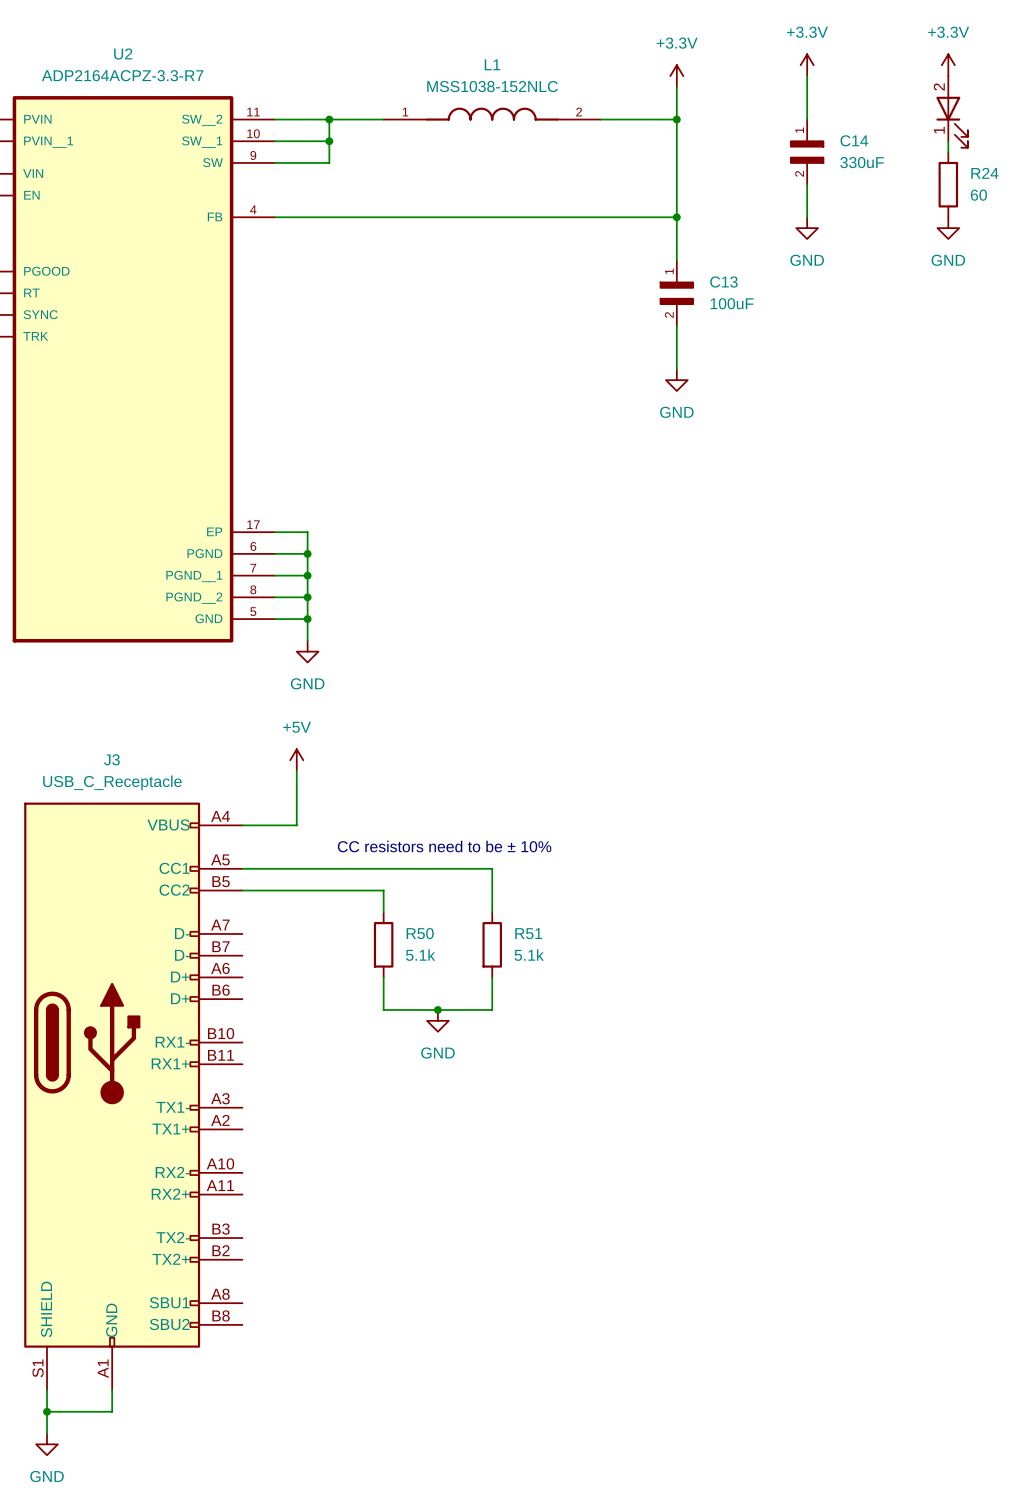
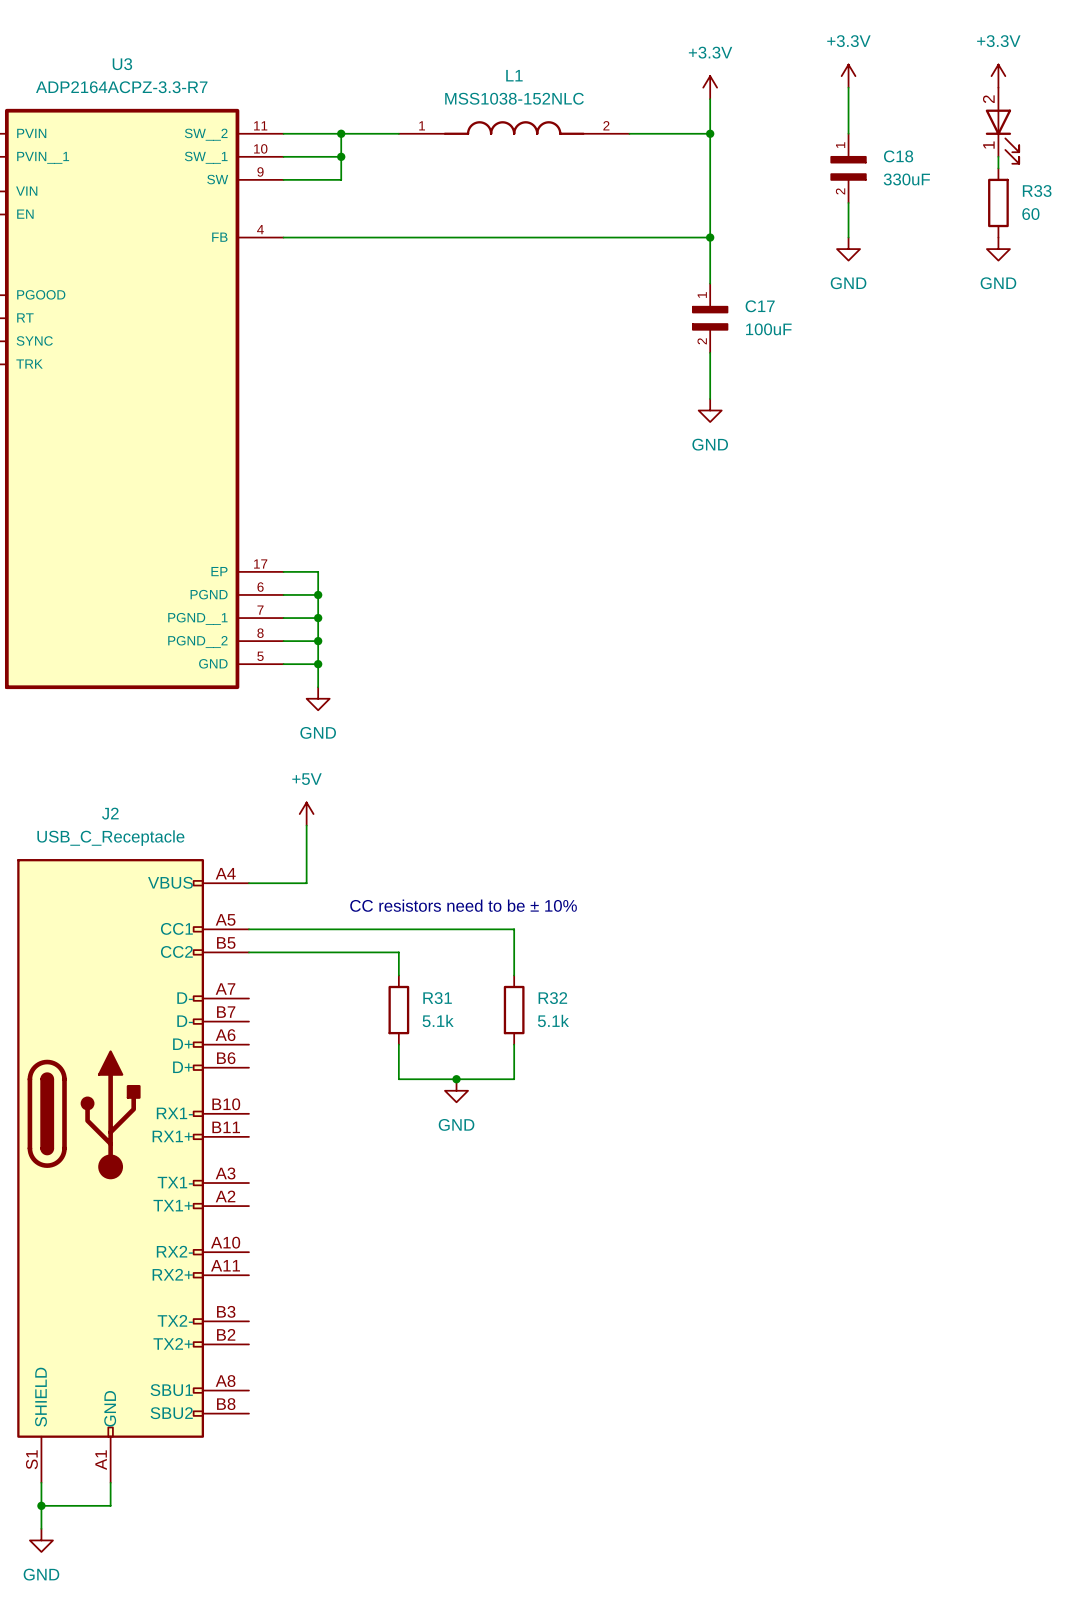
U2 name: U2 (123, 53) -> U3 (122, 64)
C14 name: C14 (854, 140) -> C18 (898, 156)
R24 name: R24 (984, 173) -> R33 (1037, 190)
C13 name: C13 (723, 282) -> C17 (760, 306)
J3 name: J3 (111, 759) -> J2 (110, 813)
R50 name: R50 (420, 933) -> R31 (437, 998)
R51 name: R51 (528, 933) -> R32 (552, 998)

